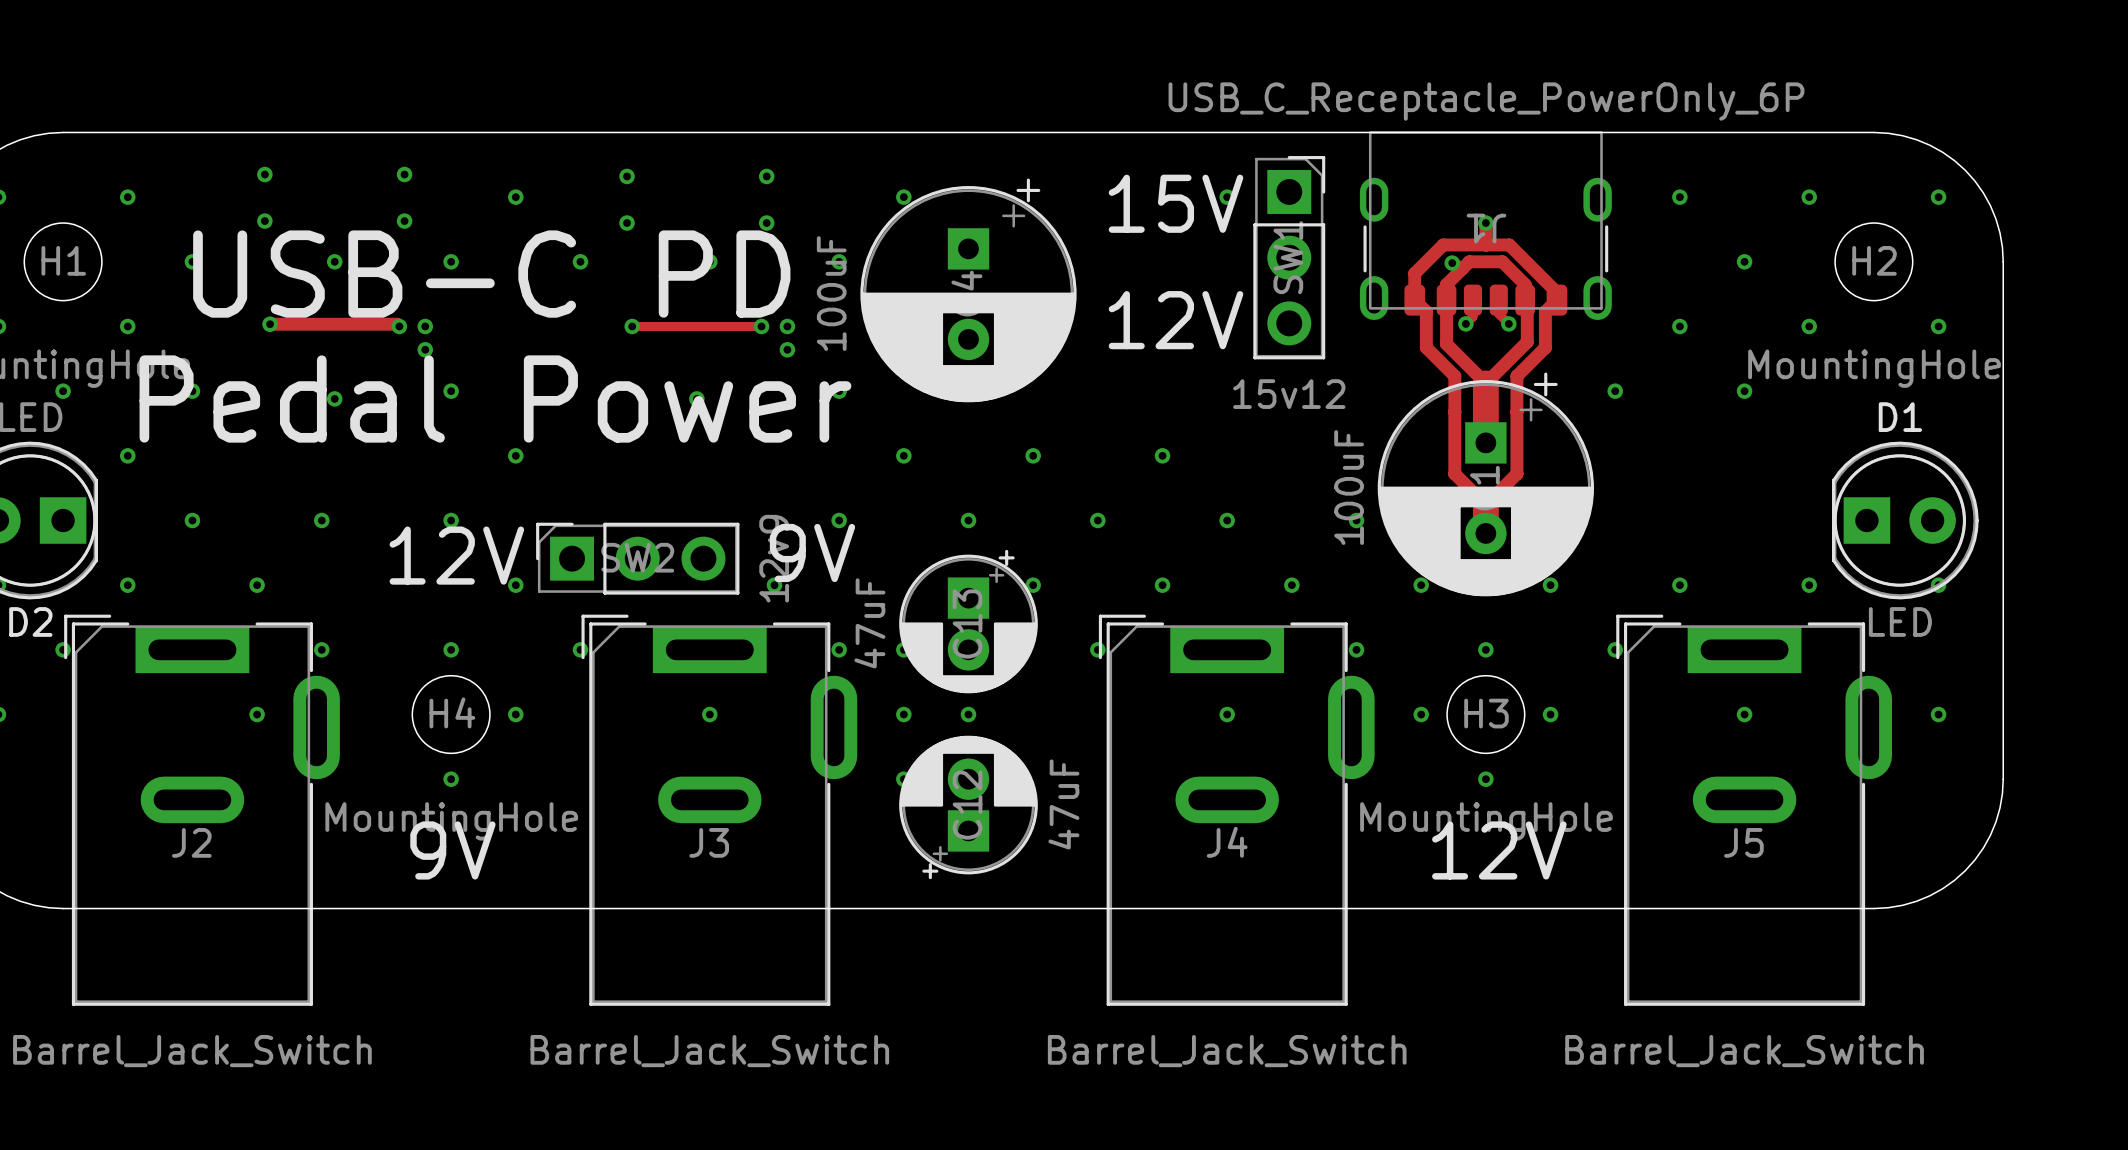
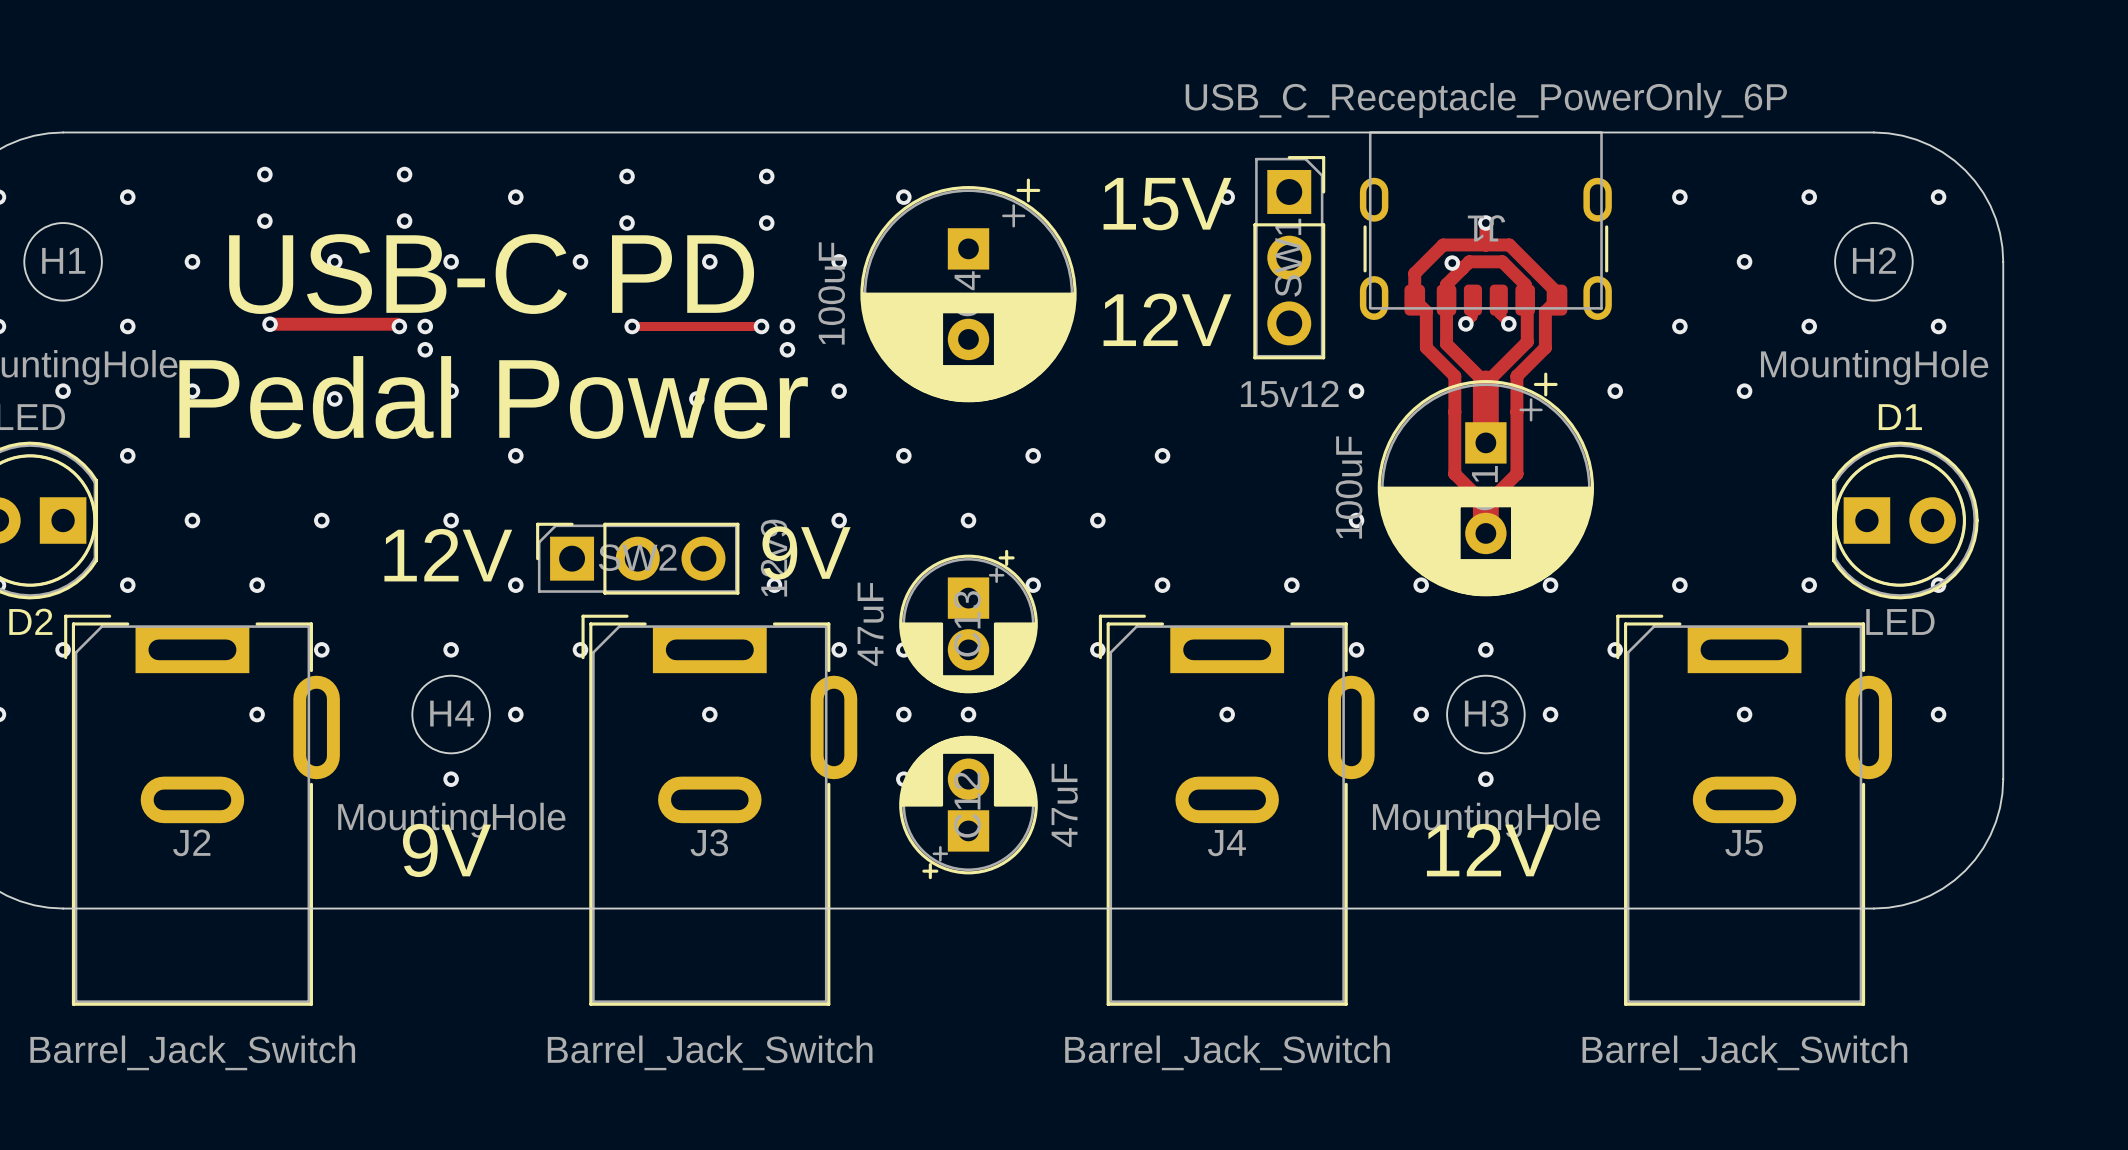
via: none -> (1356, 391)
via: (1227, 520) -> none

